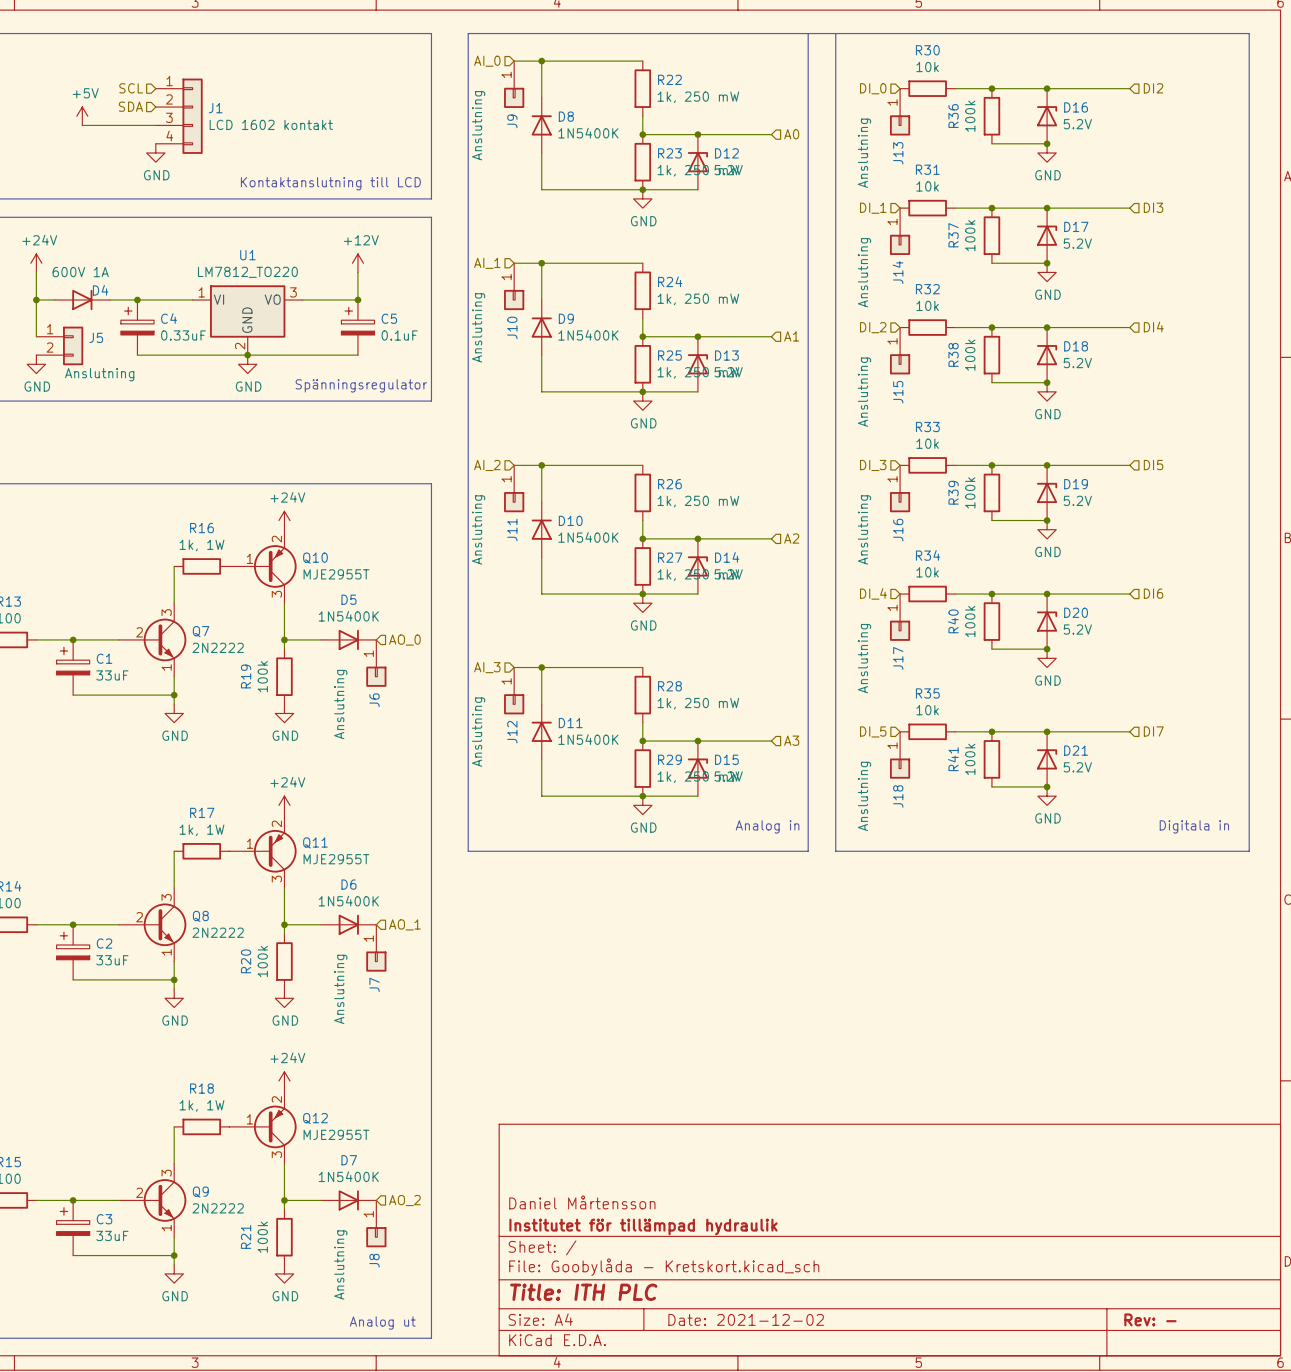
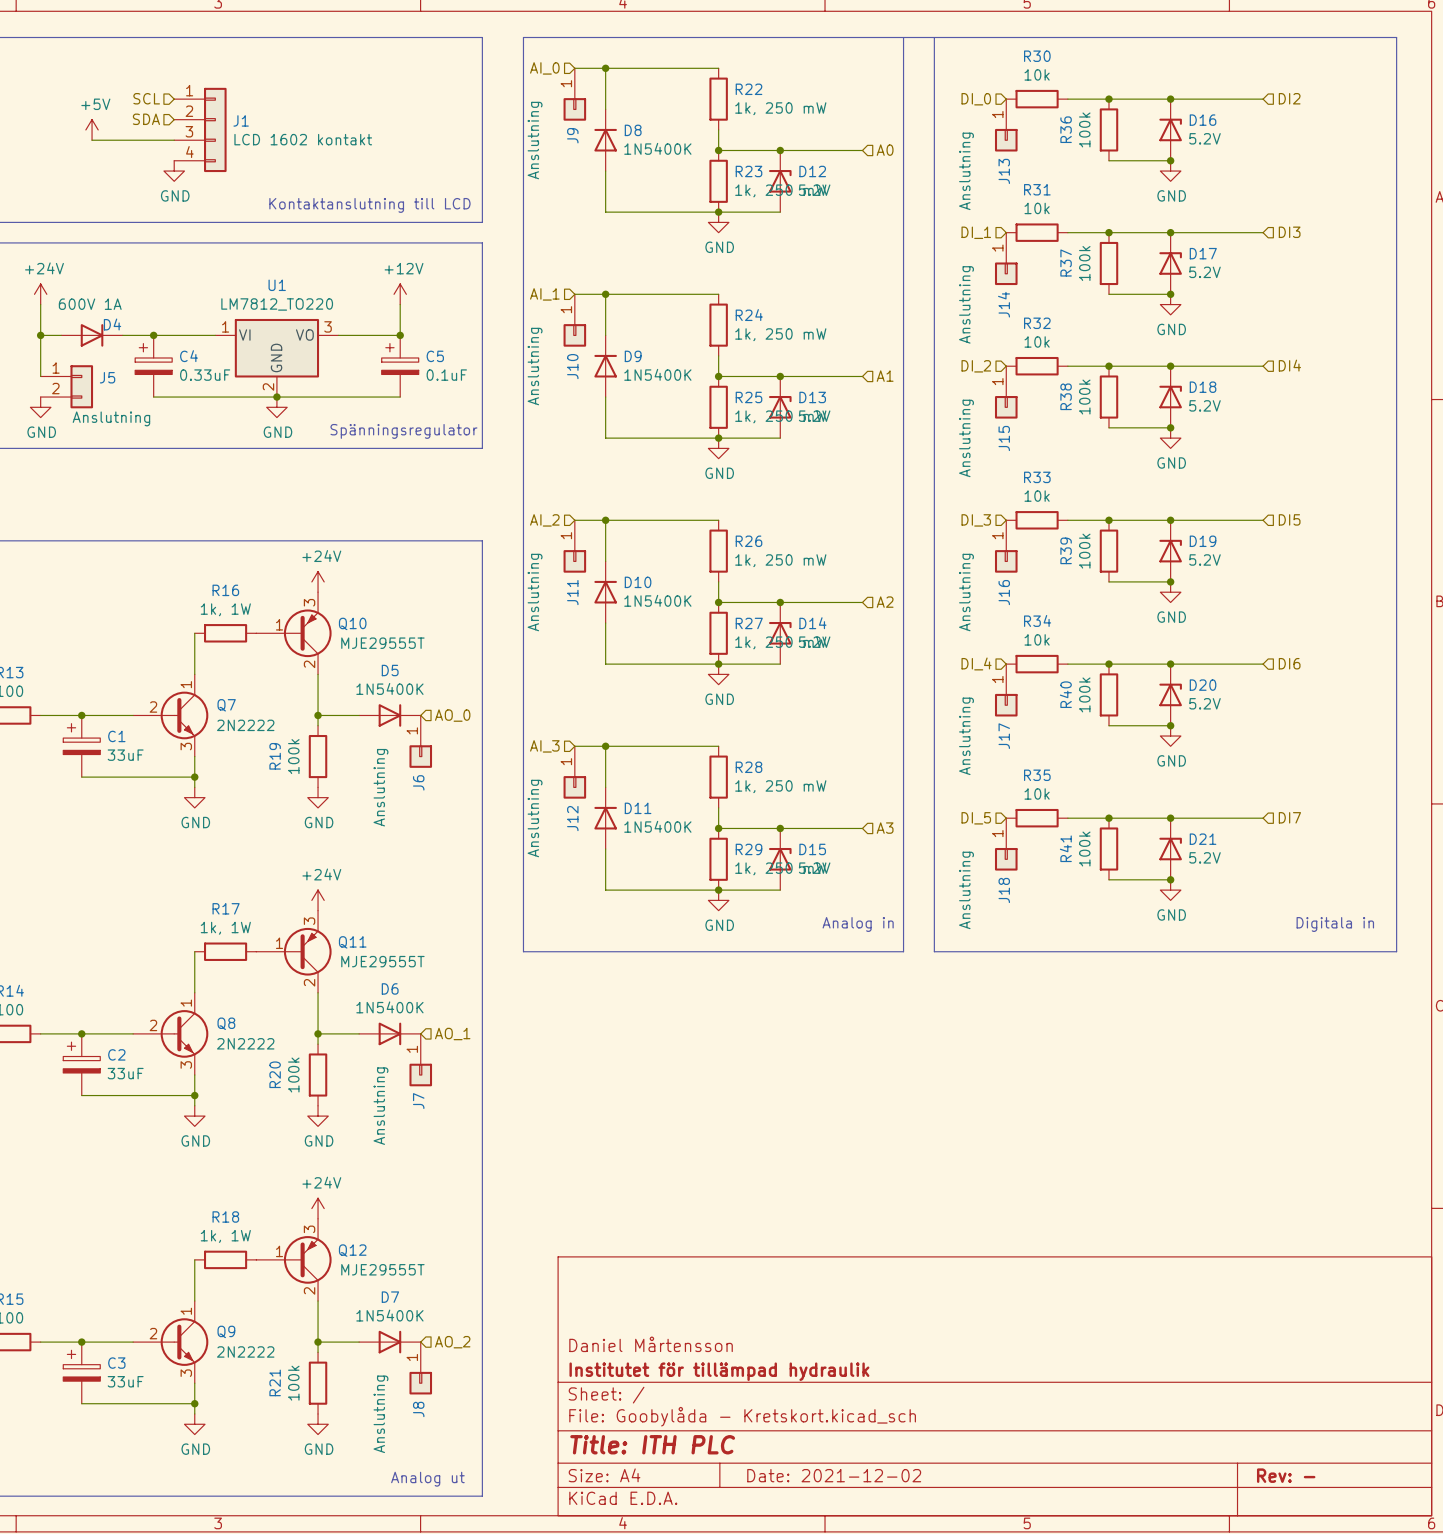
Q10 pin number: 2 (276, 539) -> 3 (309, 602)
Q10 value: MJE2955T (336, 574) -> MJE29555T (382, 643)
Q10 pin number: 3 (276, 594) -> 2 (309, 664)
Q7 symbol: [119, 603, 187, 677] -> [133, 674, 209, 757]
Q11 pin number: 2 (276, 823) -> 3 (309, 921)
Q11 value: MJE2955T (336, 859) -> MJE29555T (382, 961)
Q11 pin number: 3 (276, 879) -> 2 (309, 982)
Q8 symbol: [119, 888, 187, 962] -> [133, 992, 209, 1076]
Q12 pin number: 2 (276, 1099) -> 3 (309, 1229)
Q12 value: MJE2955T (336, 1134) -> MJE29555T (382, 1269)
Q12 pin number: 3 (276, 1154) -> 2 (309, 1290)
Q9 symbol: [119, 1163, 187, 1238] -> [133, 1300, 209, 1384]

